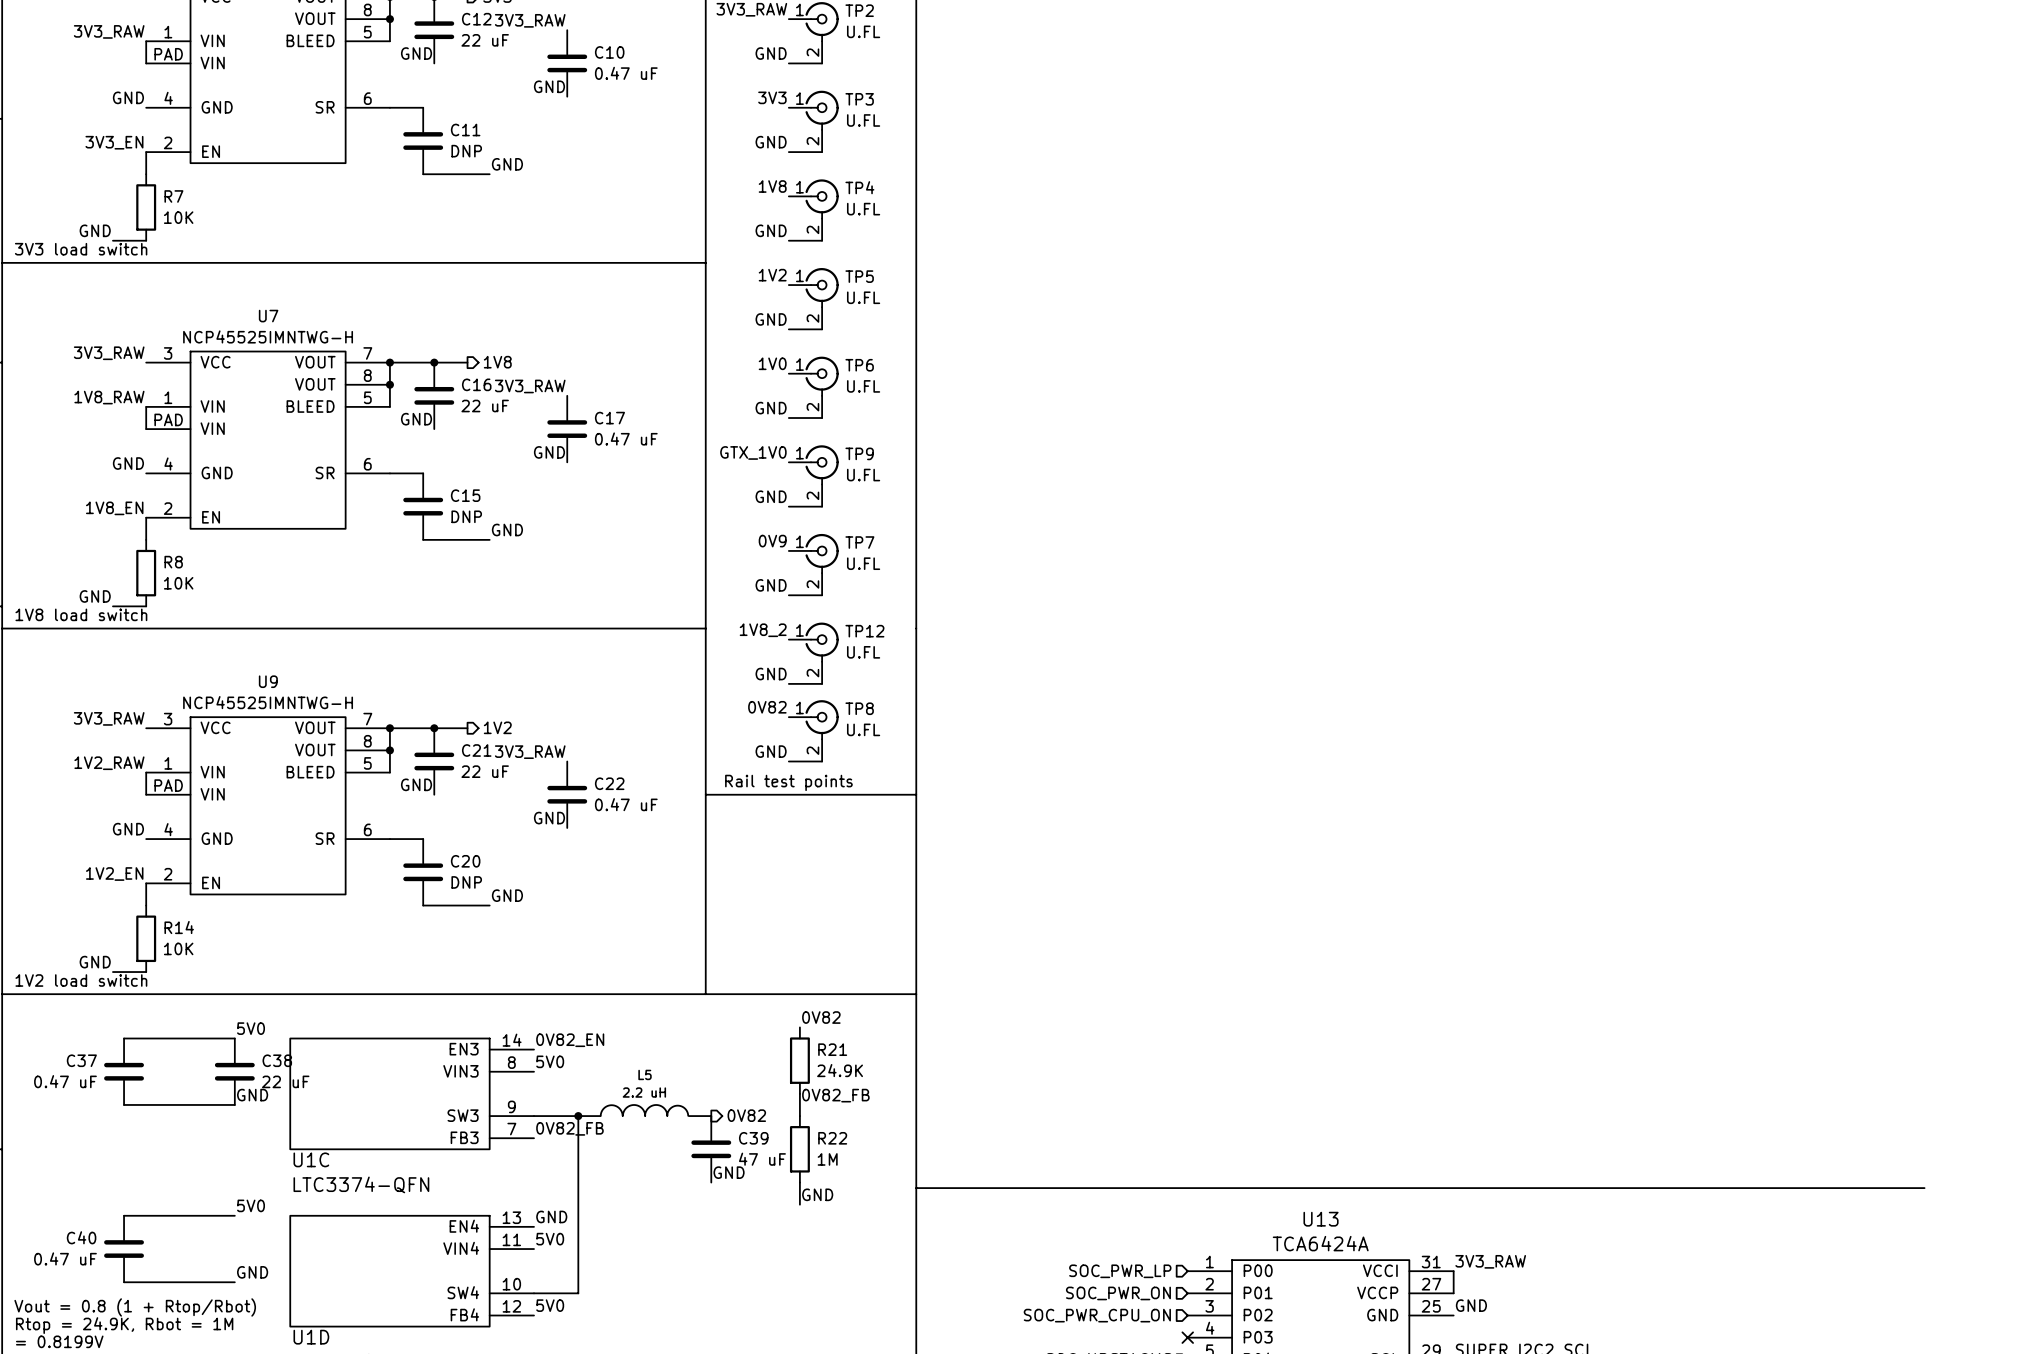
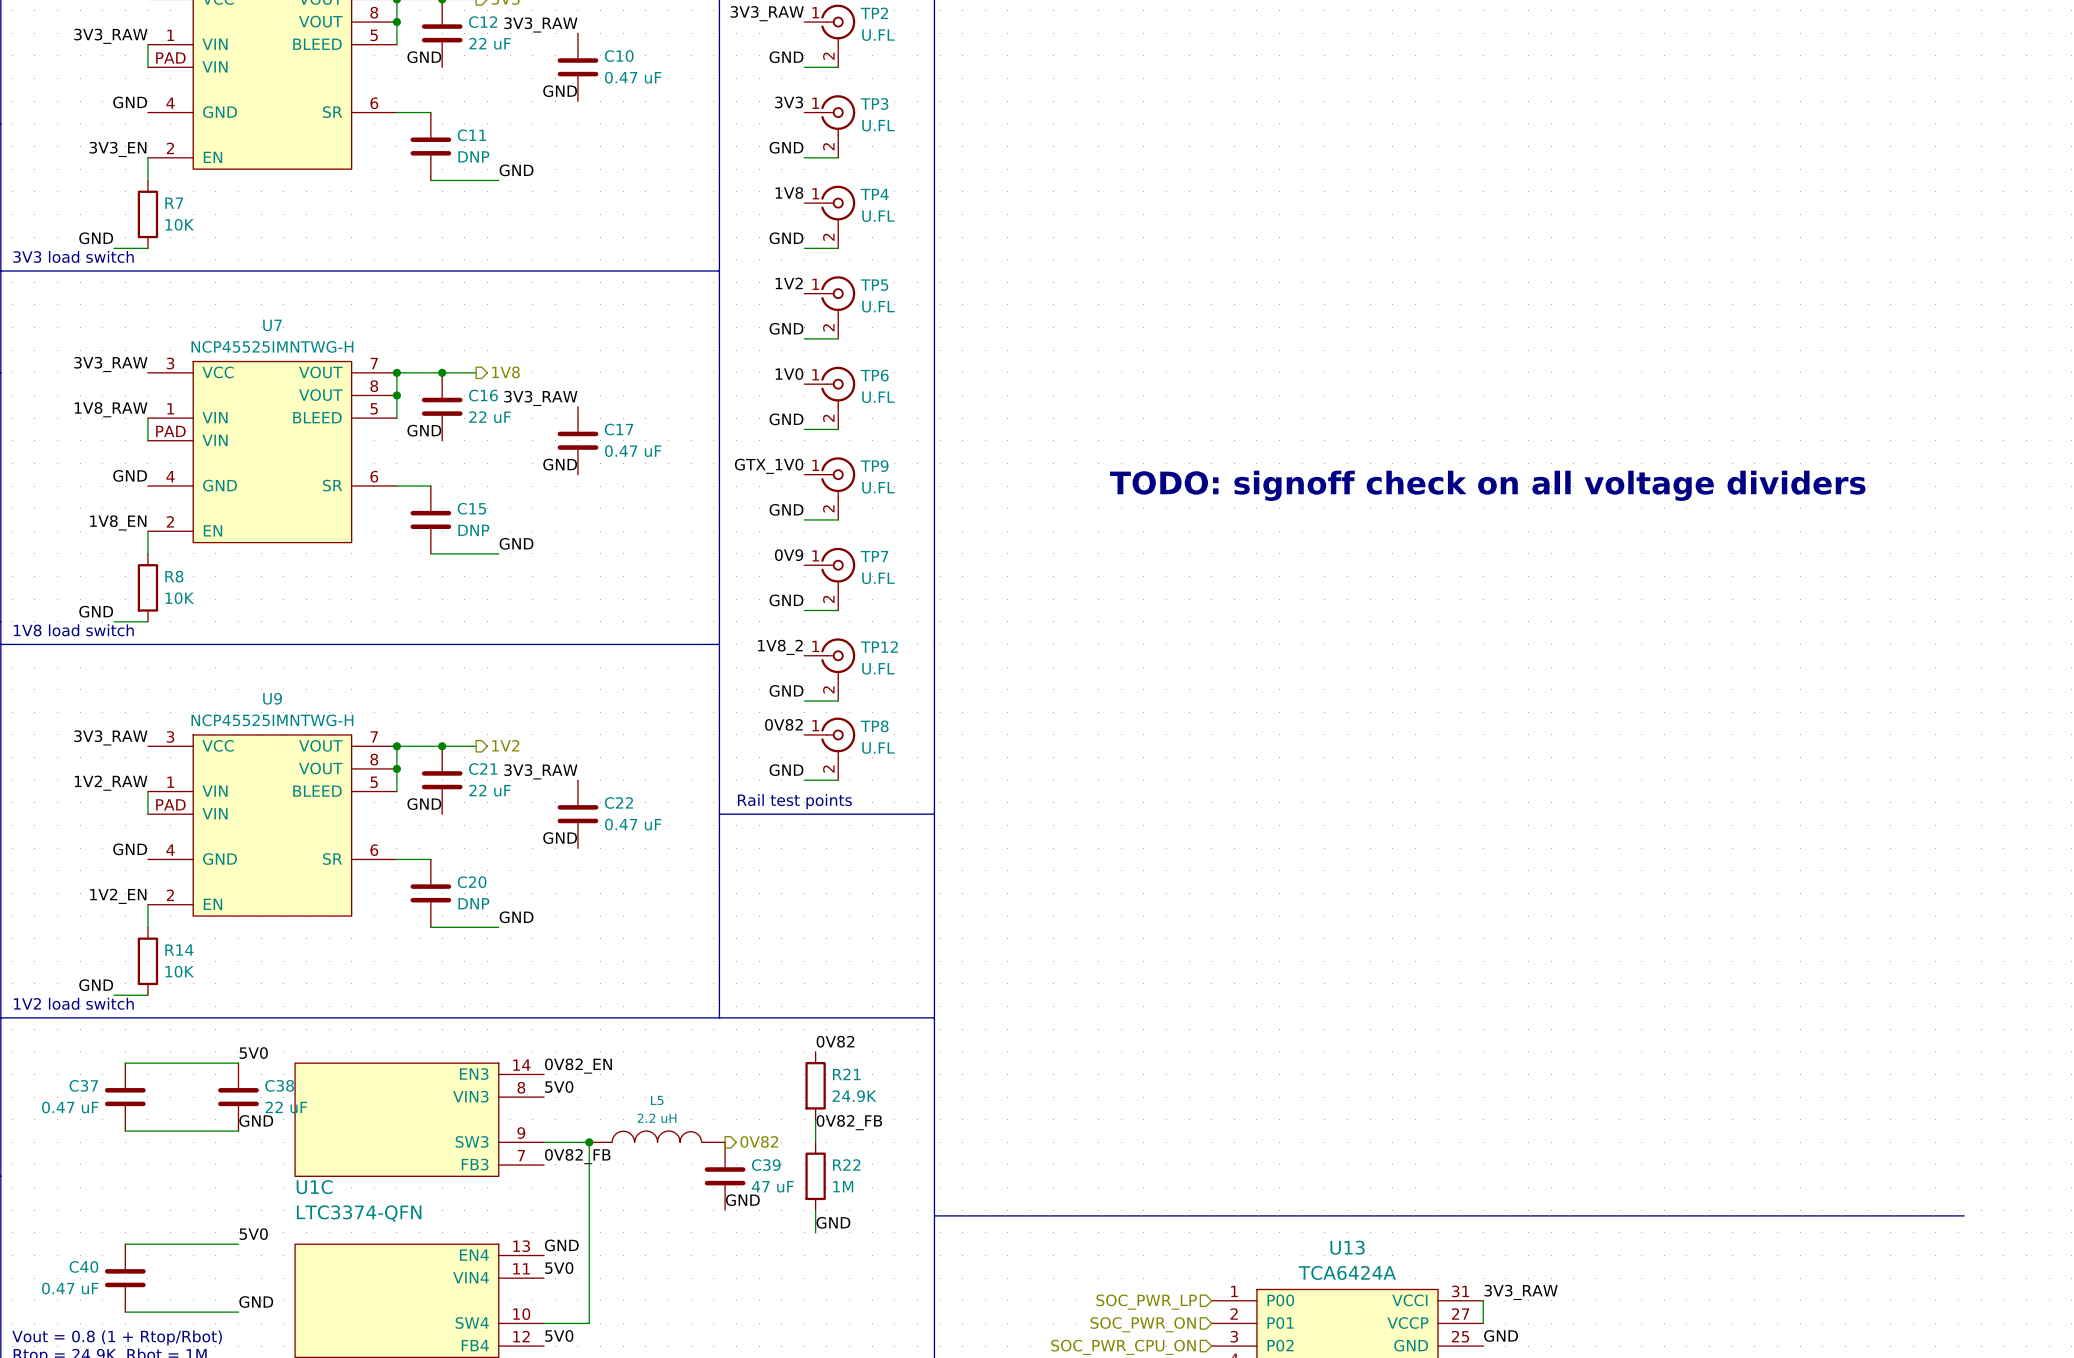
text: none -> TODO: signoff check on all voltage dividers (1487, 485)

